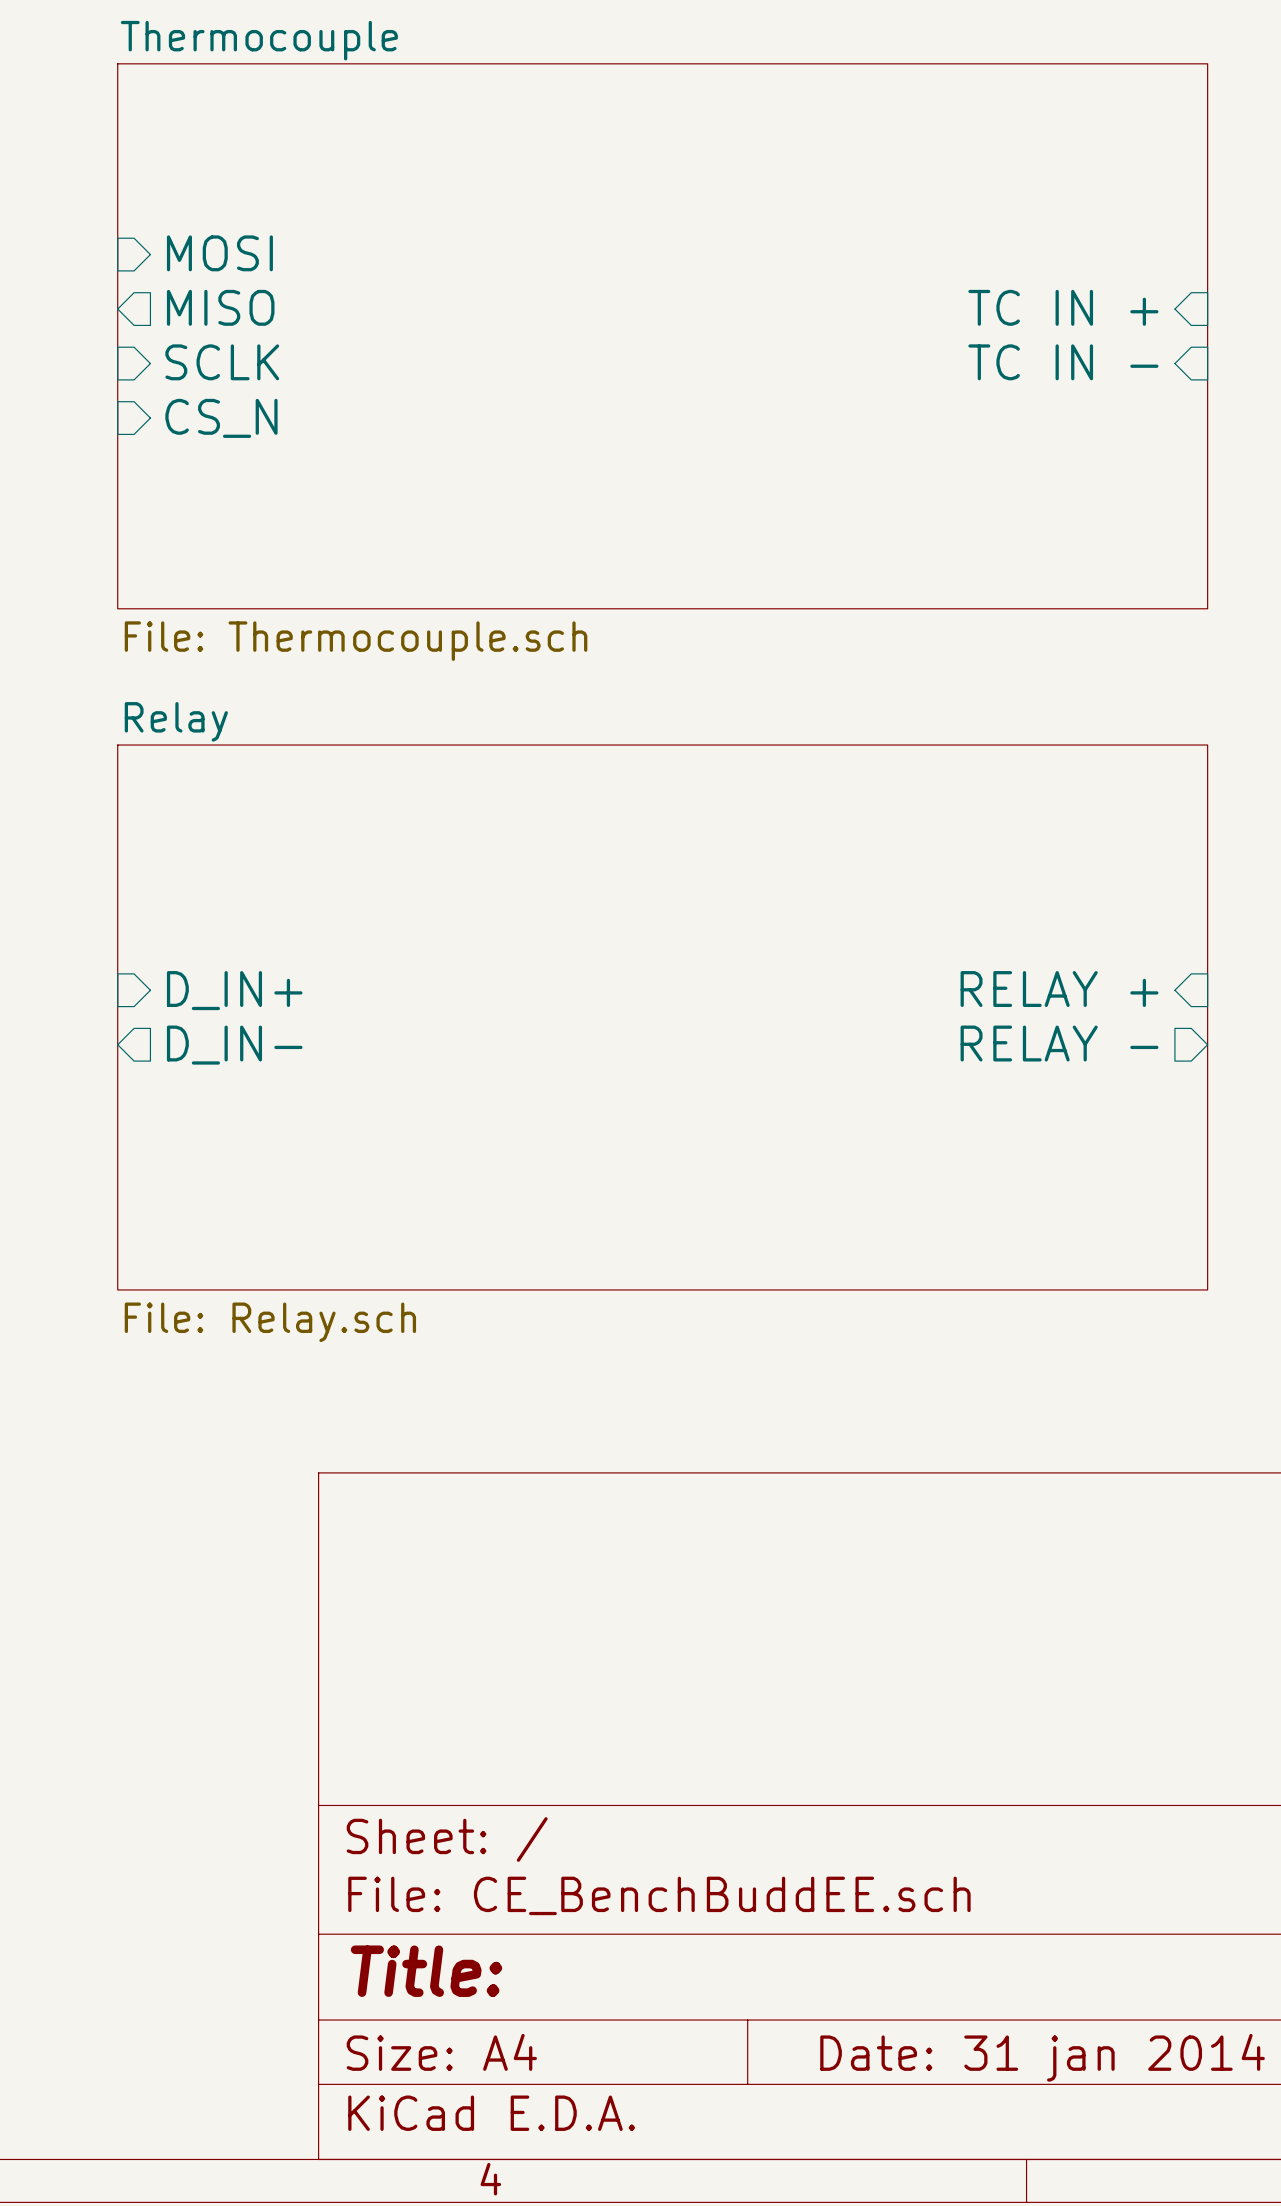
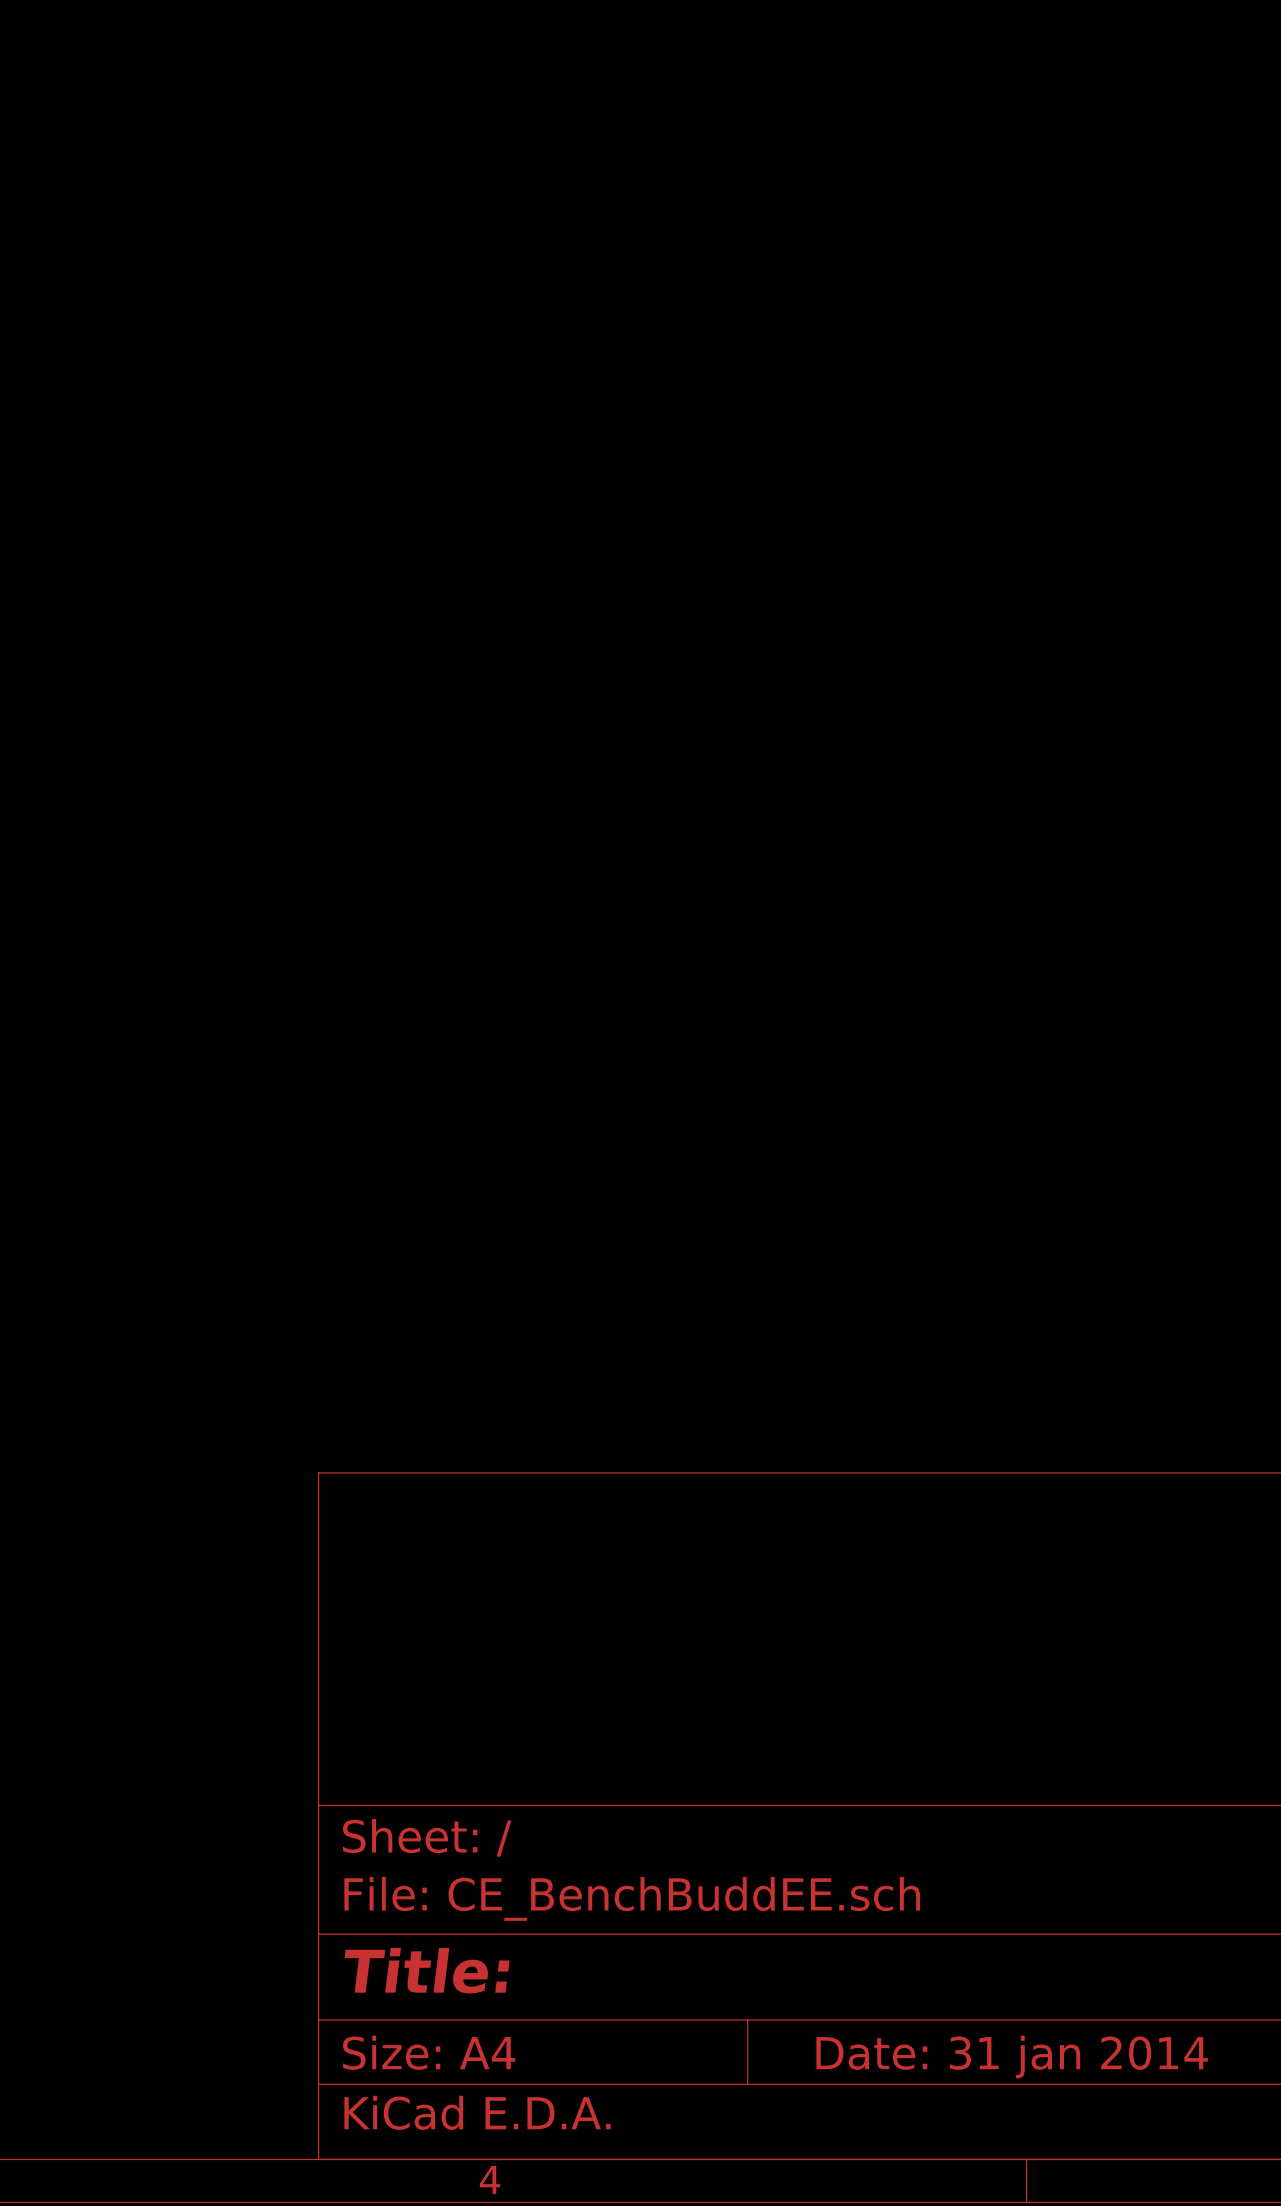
sheet pin: MOSI (219, 253) -> none
sheet pin: MISO (220, 307) -> none
sheet pin: TC IN + (1063, 307) -> none
sheet Thermocouple: File: Thermocouple.sch (662, 336) -> none
sheet pin: SCLK (222, 362) -> none
sheet pin: TC IN - (1063, 362) -> none
sheet pin: CS_N (221, 418) -> none
sheet pin: RELAY + (1059, 989) -> none
sheet pin: D_IN+ (234, 990) -> none
sheet Relay: File: Relay.sch (662, 1017) -> none
sheet pin: RELAY - (1059, 1043) -> none
sheet pin: D_IN- (234, 1045) -> none

